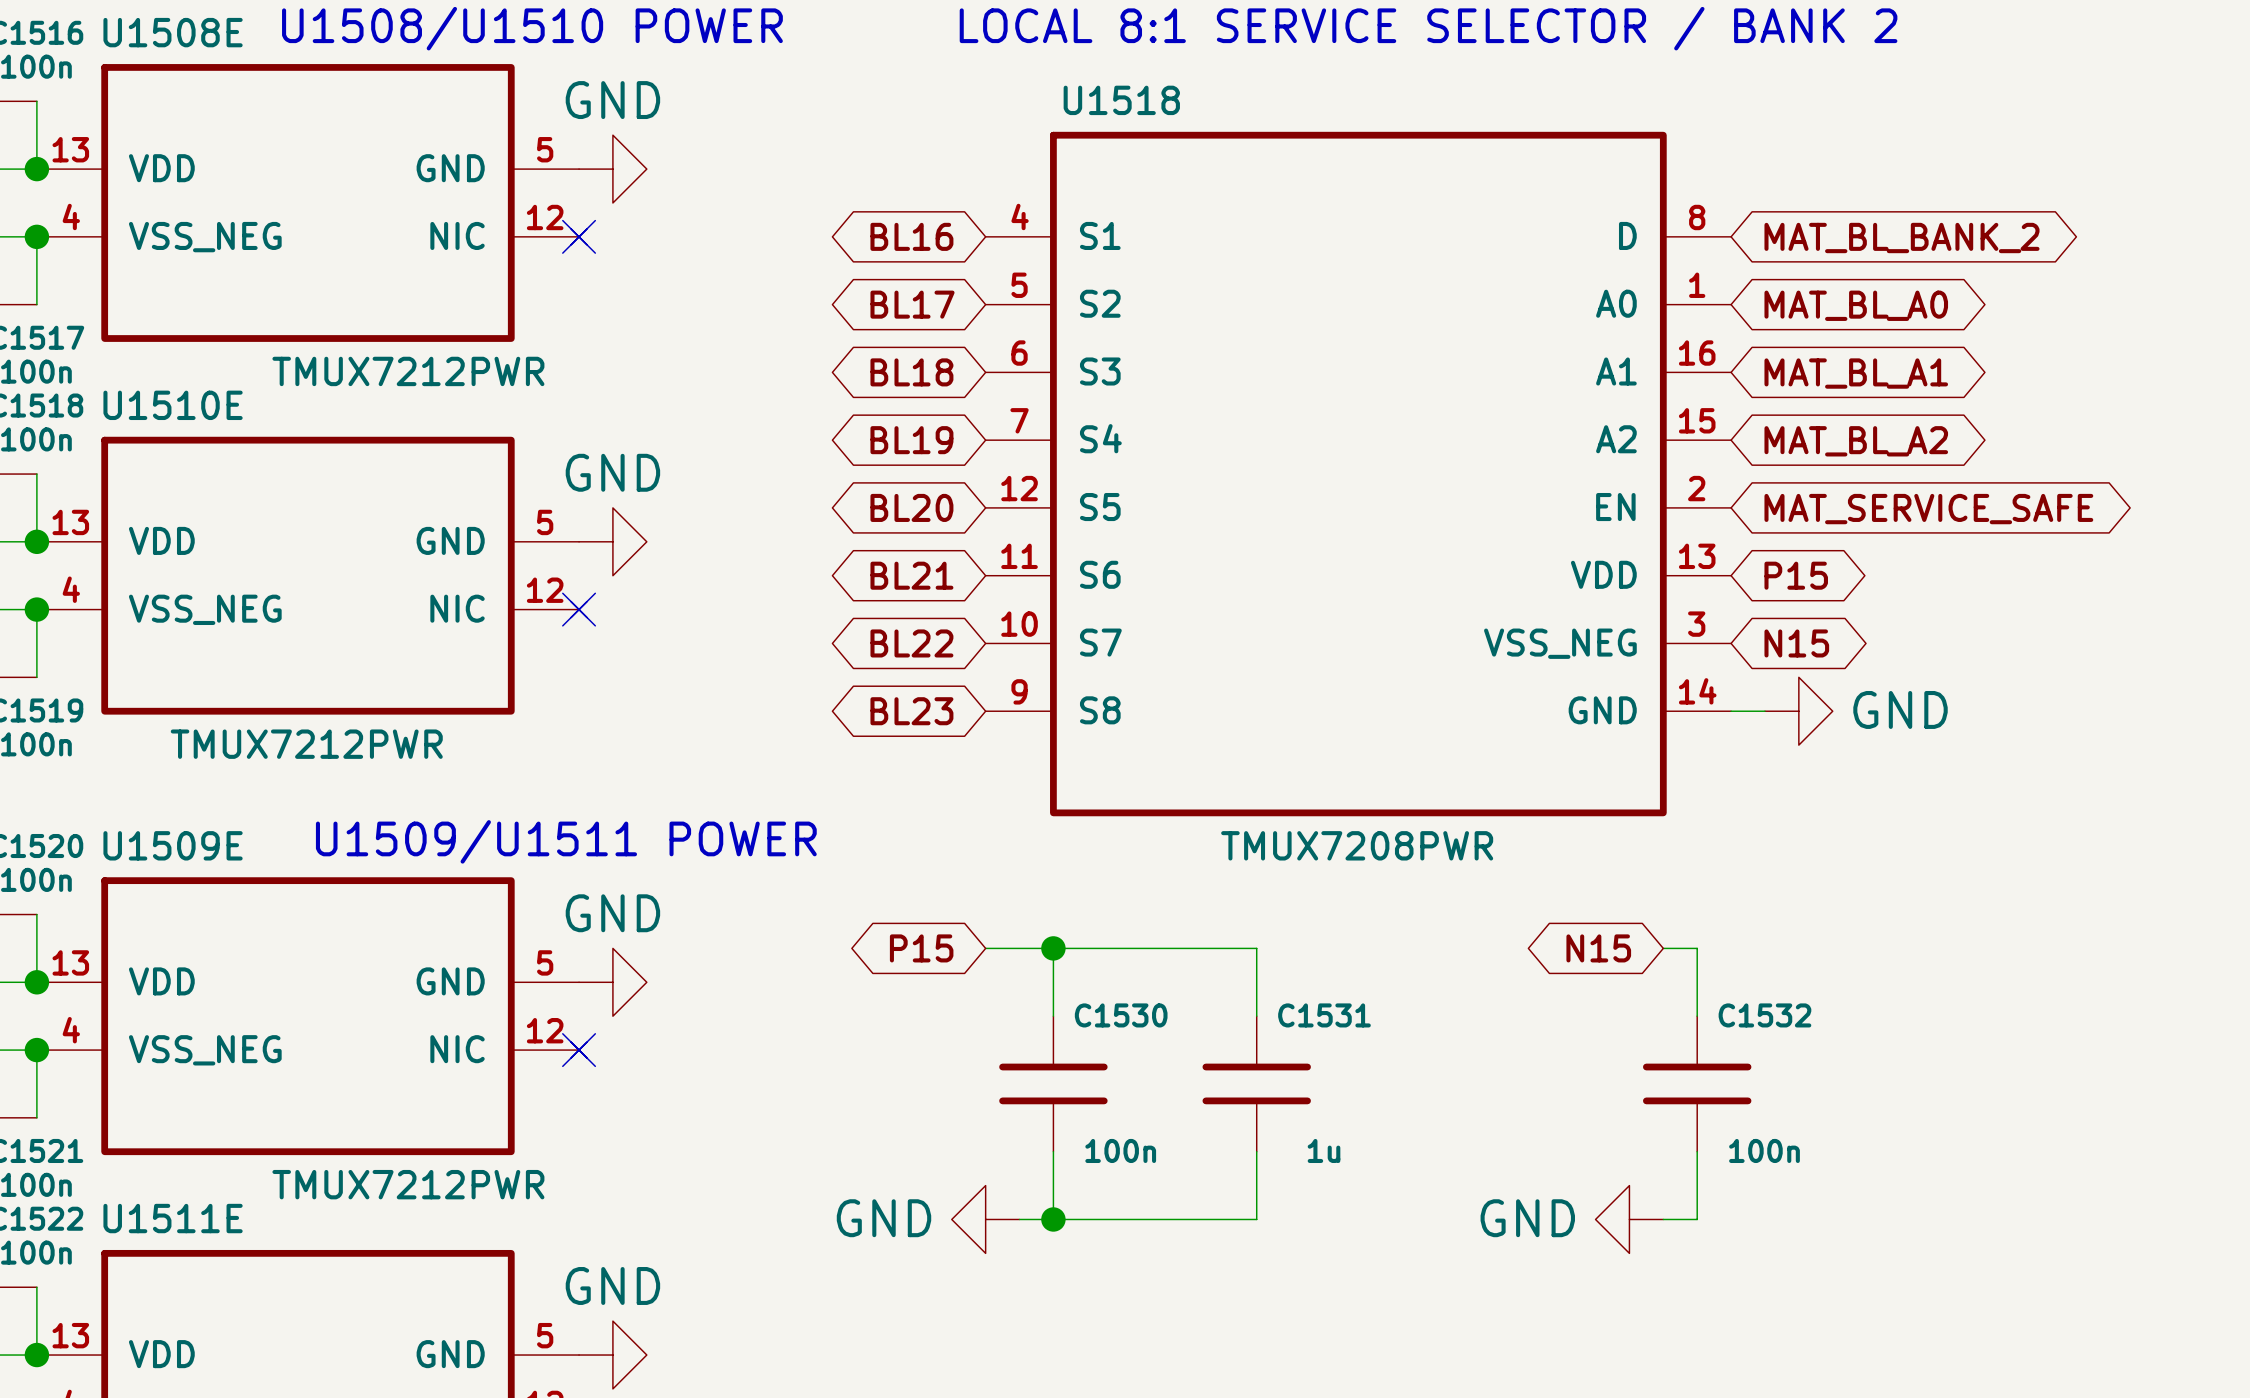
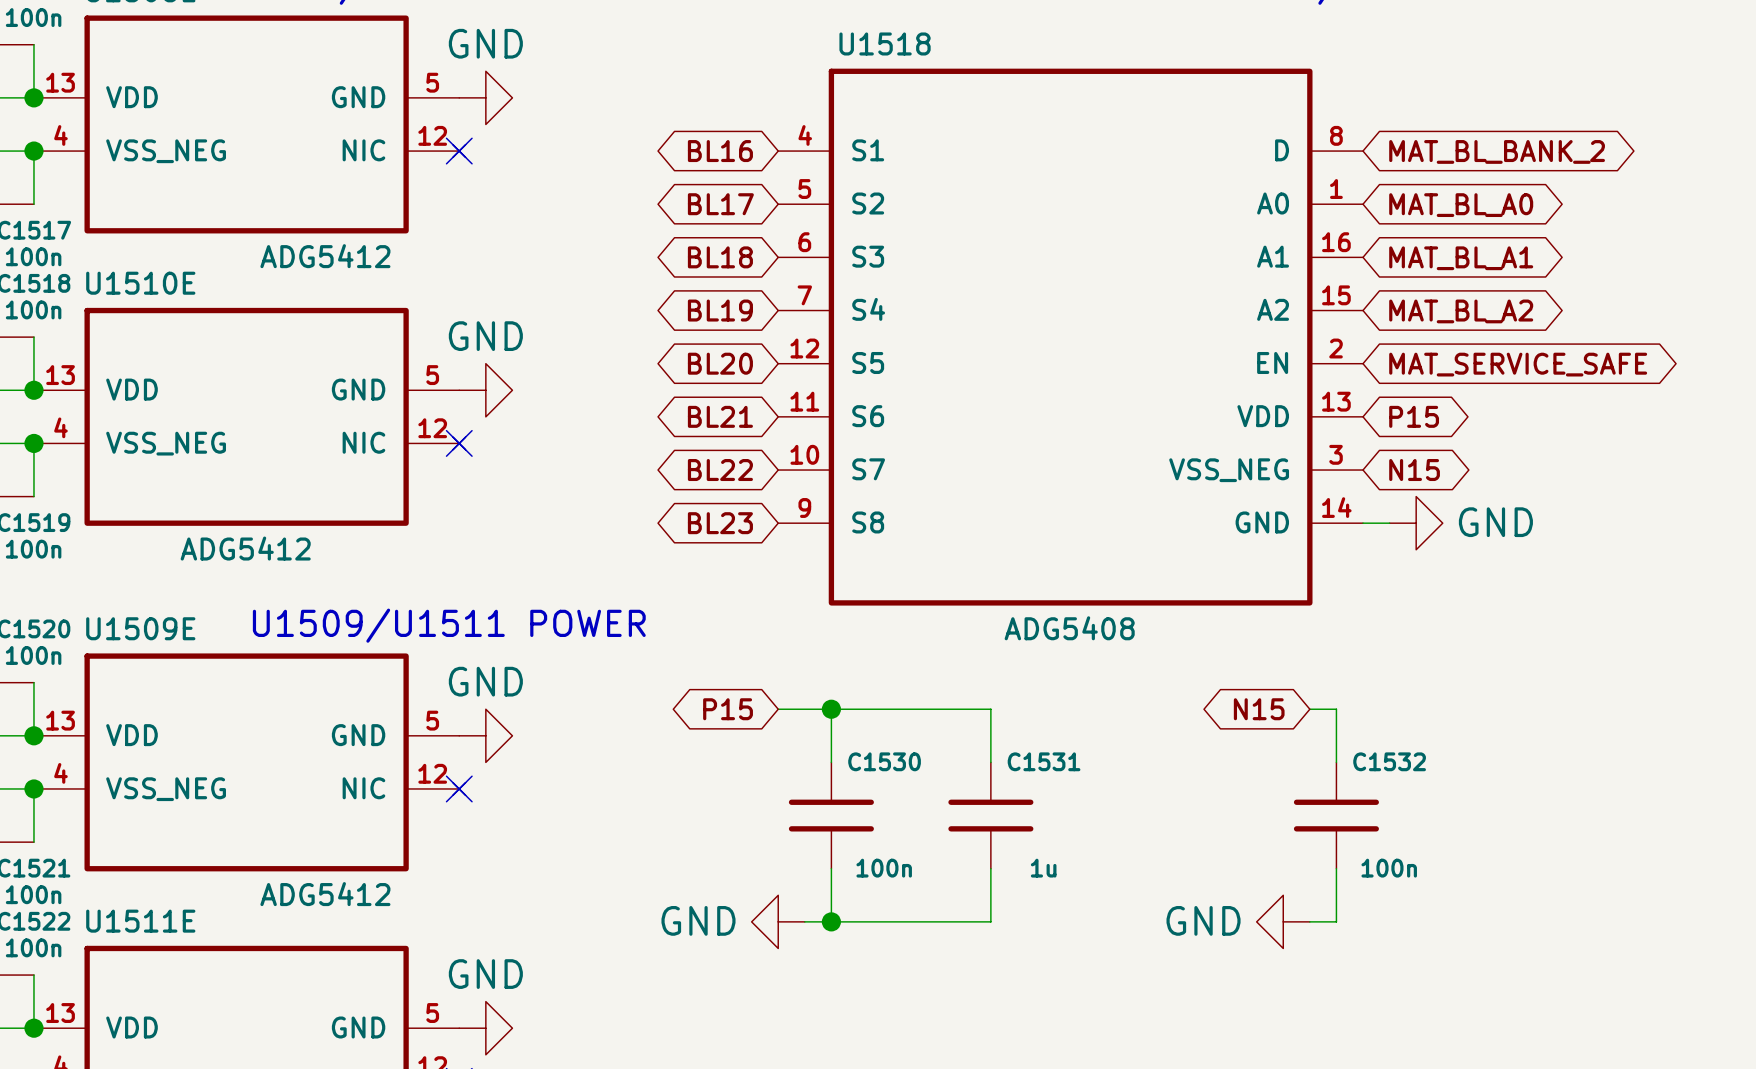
U1508E value: TMUX7212PWR (408, 371) -> ADG5412 (325, 256)
U1510E value: TMUX7212PWR (306, 744) -> ADG5412 (245, 548)
U1518 value: TMUX7208PWR (1357, 845) -> ADG5408 (1069, 628)
U1509E value: TMUX7212PWR (408, 1184) -> ADG5412 (325, 894)

